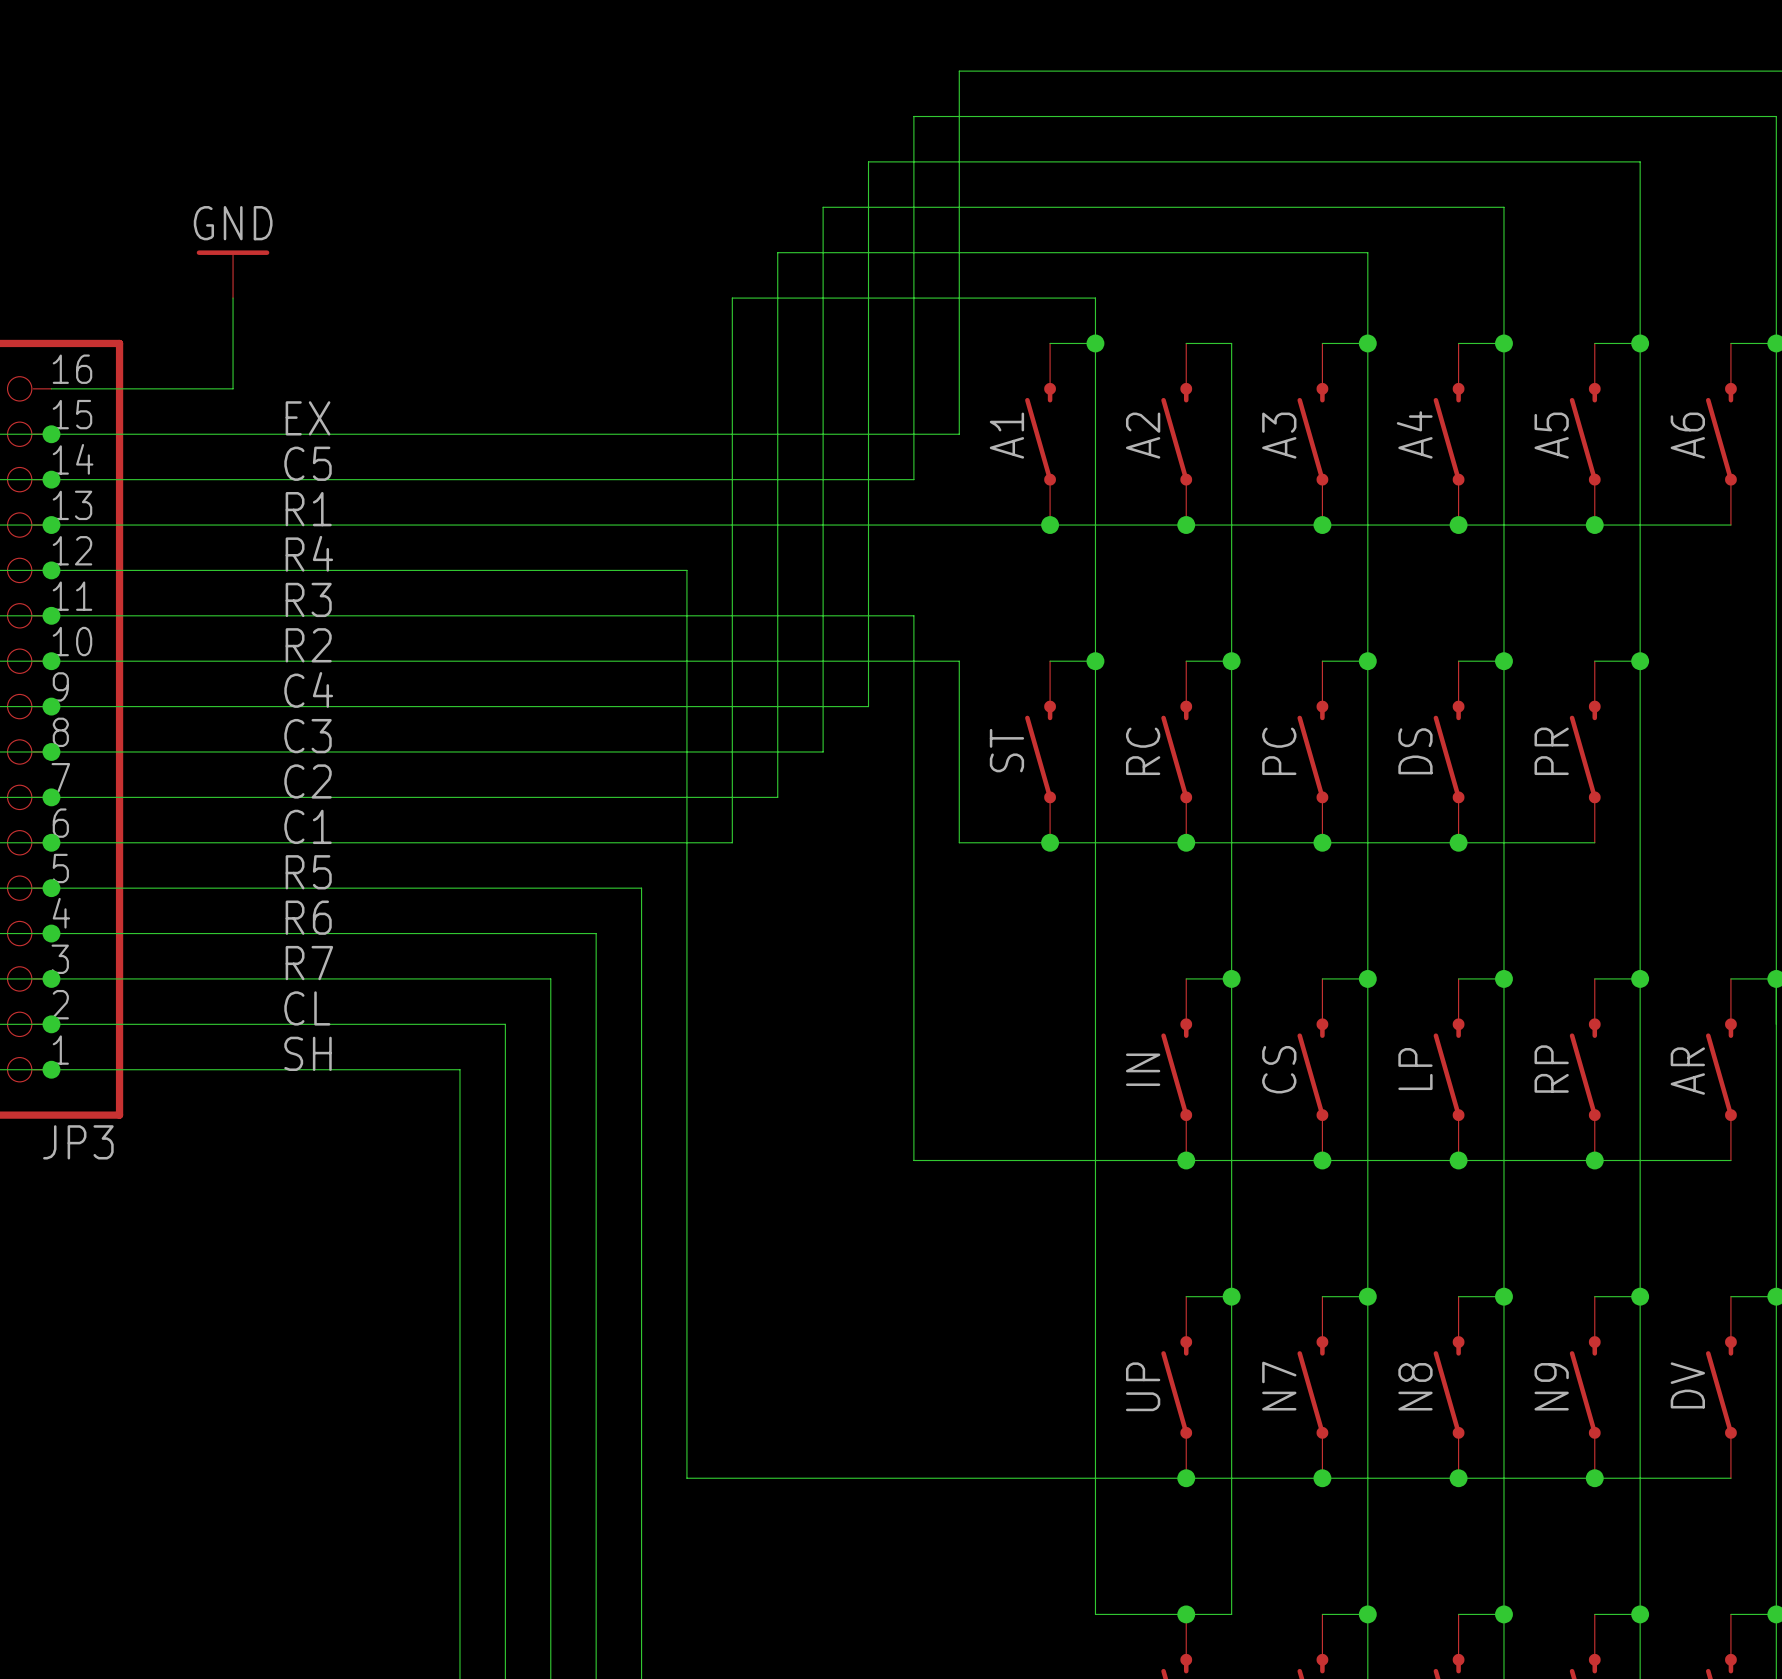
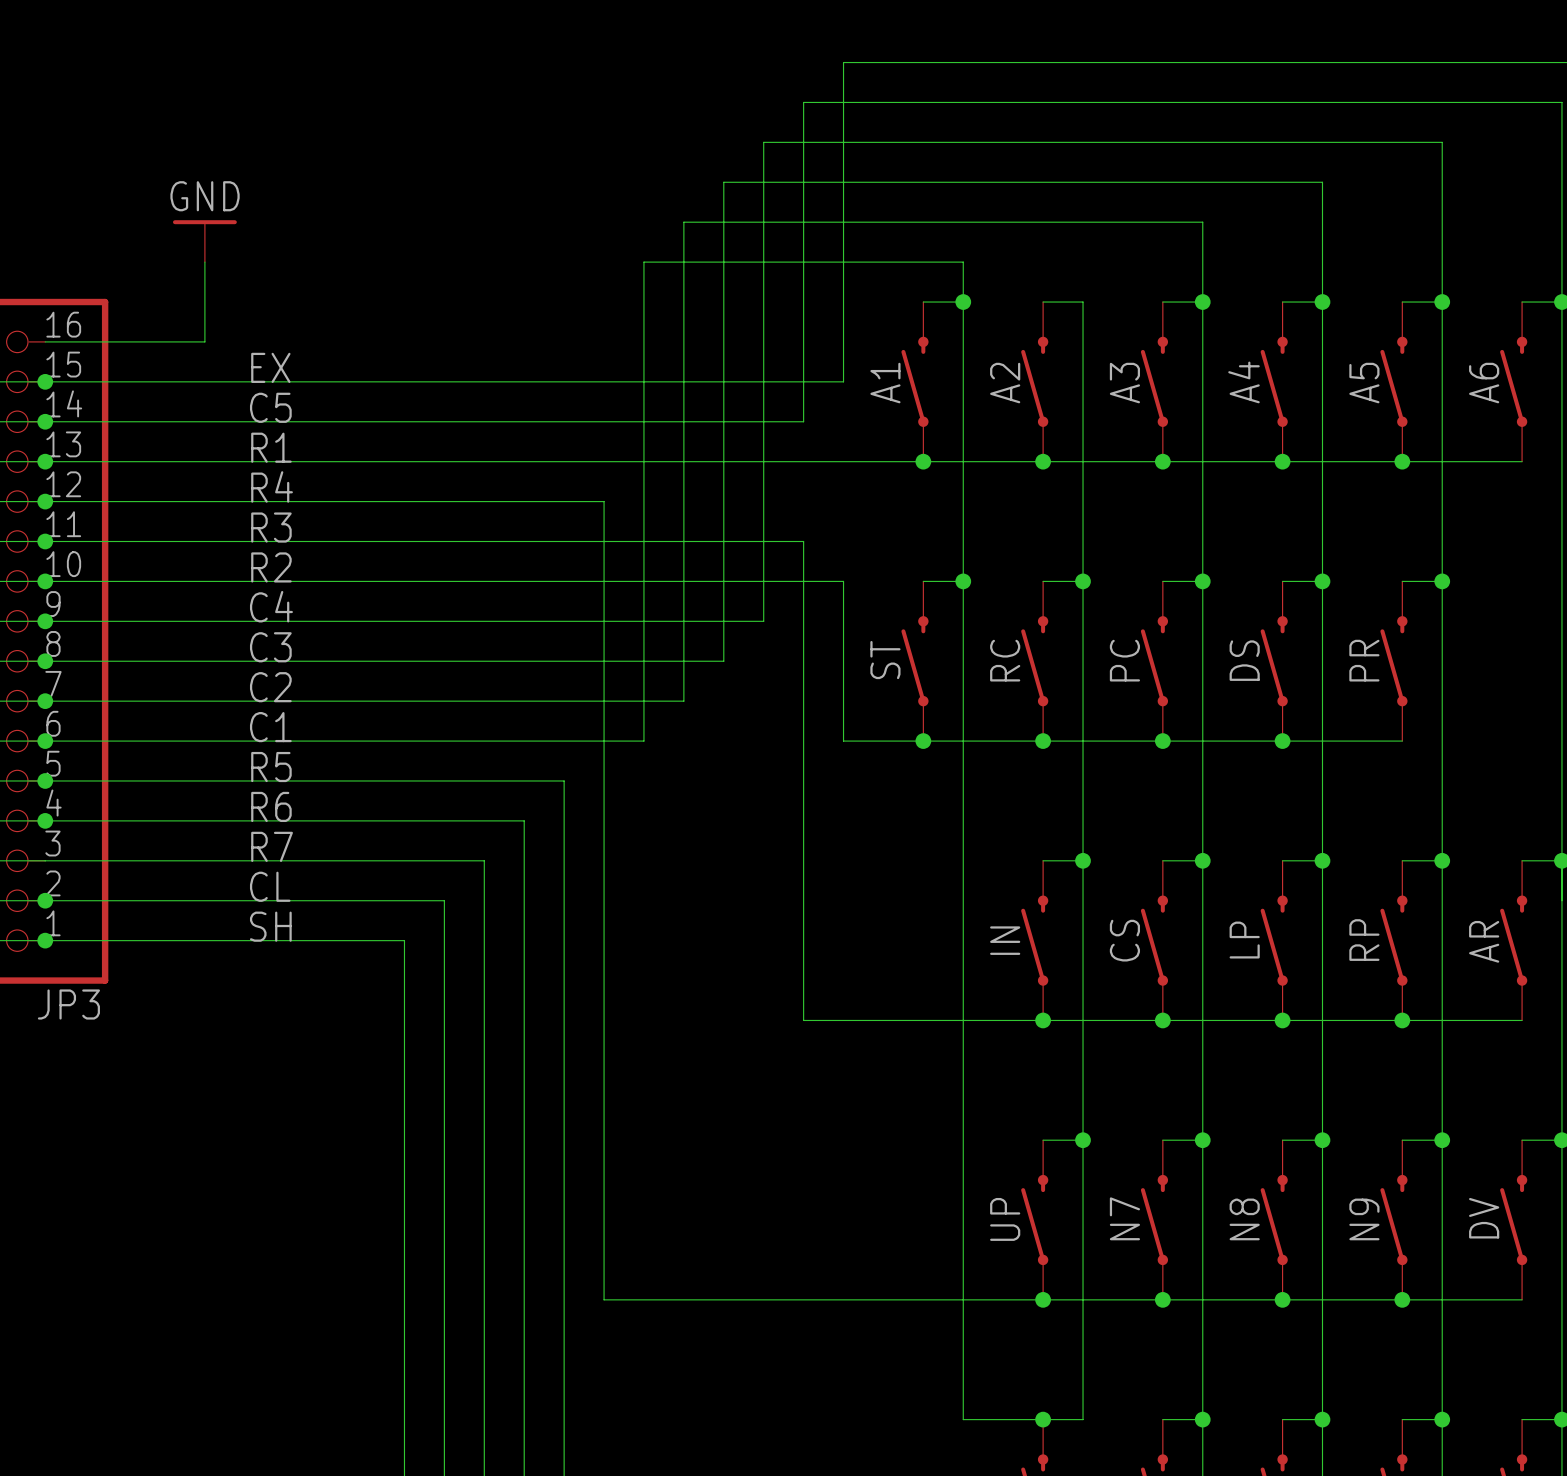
junction: (51, 978) -> none

